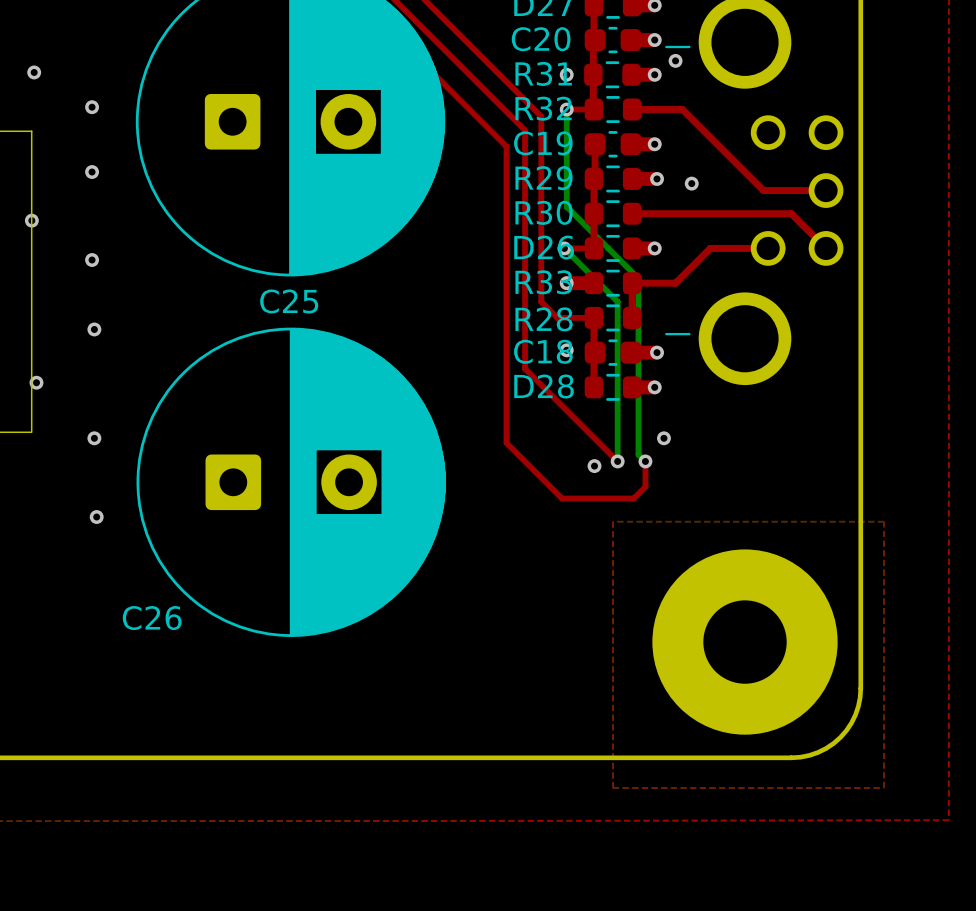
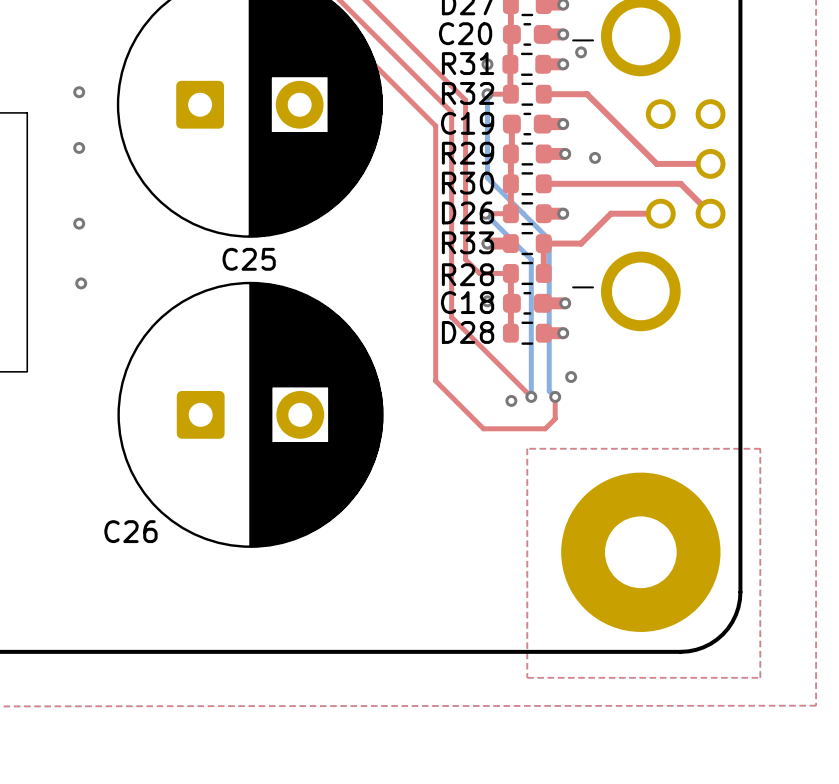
via: (34, 72) -> none
via: (31, 220) -> none
via: (36, 382) -> none
via: (94, 438) -> none
via: (96, 517) -> none

